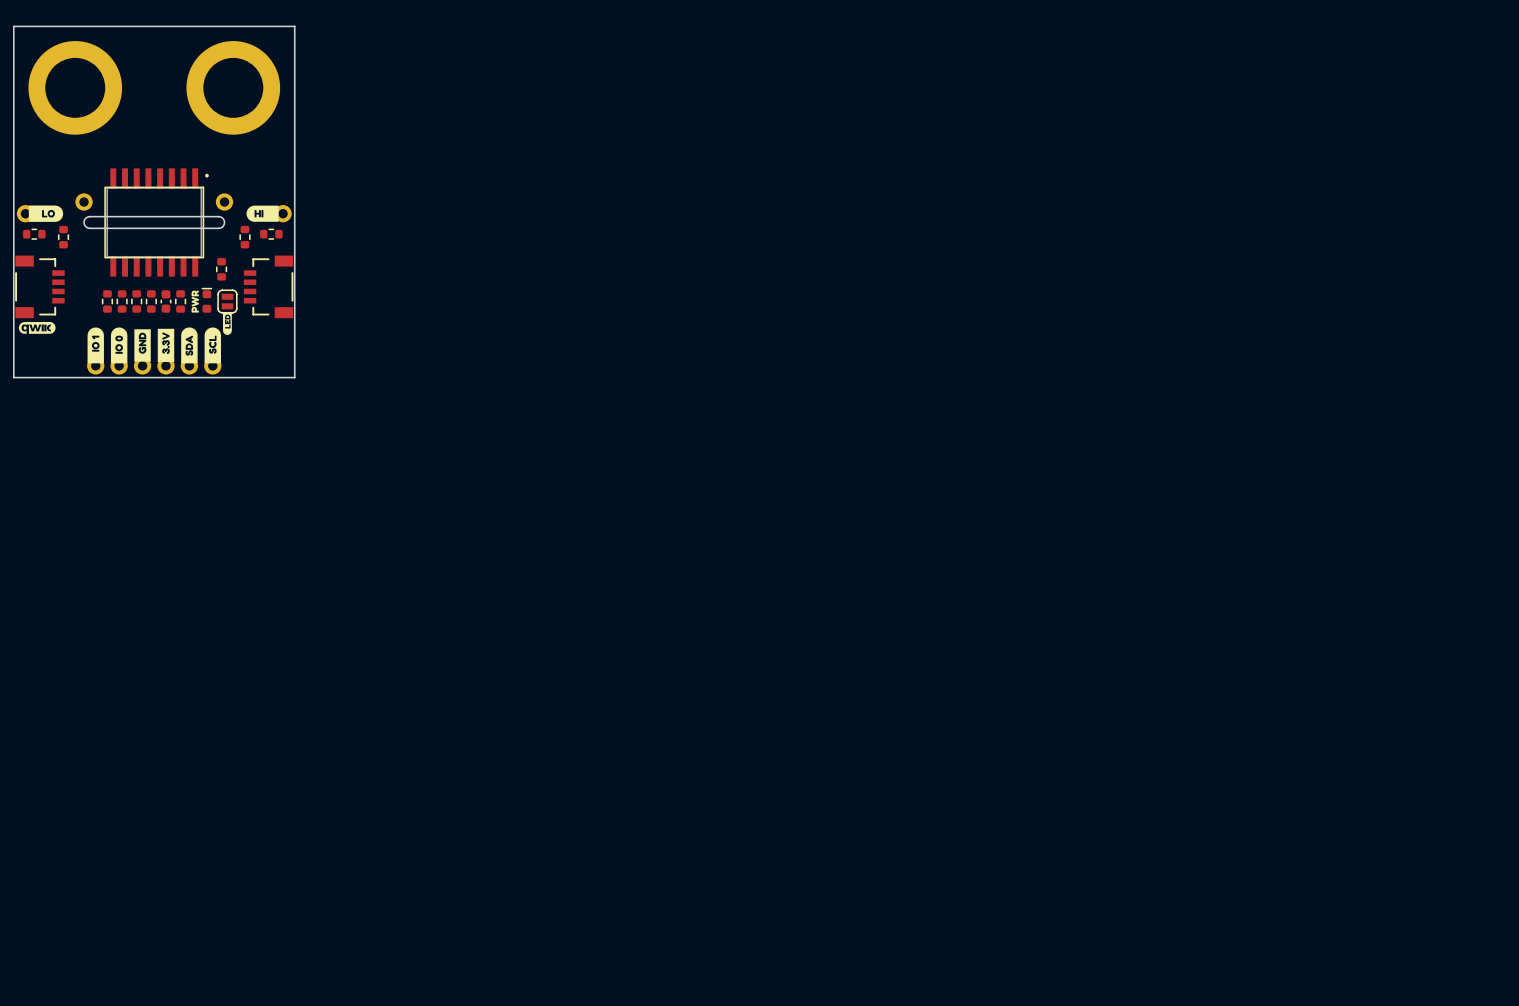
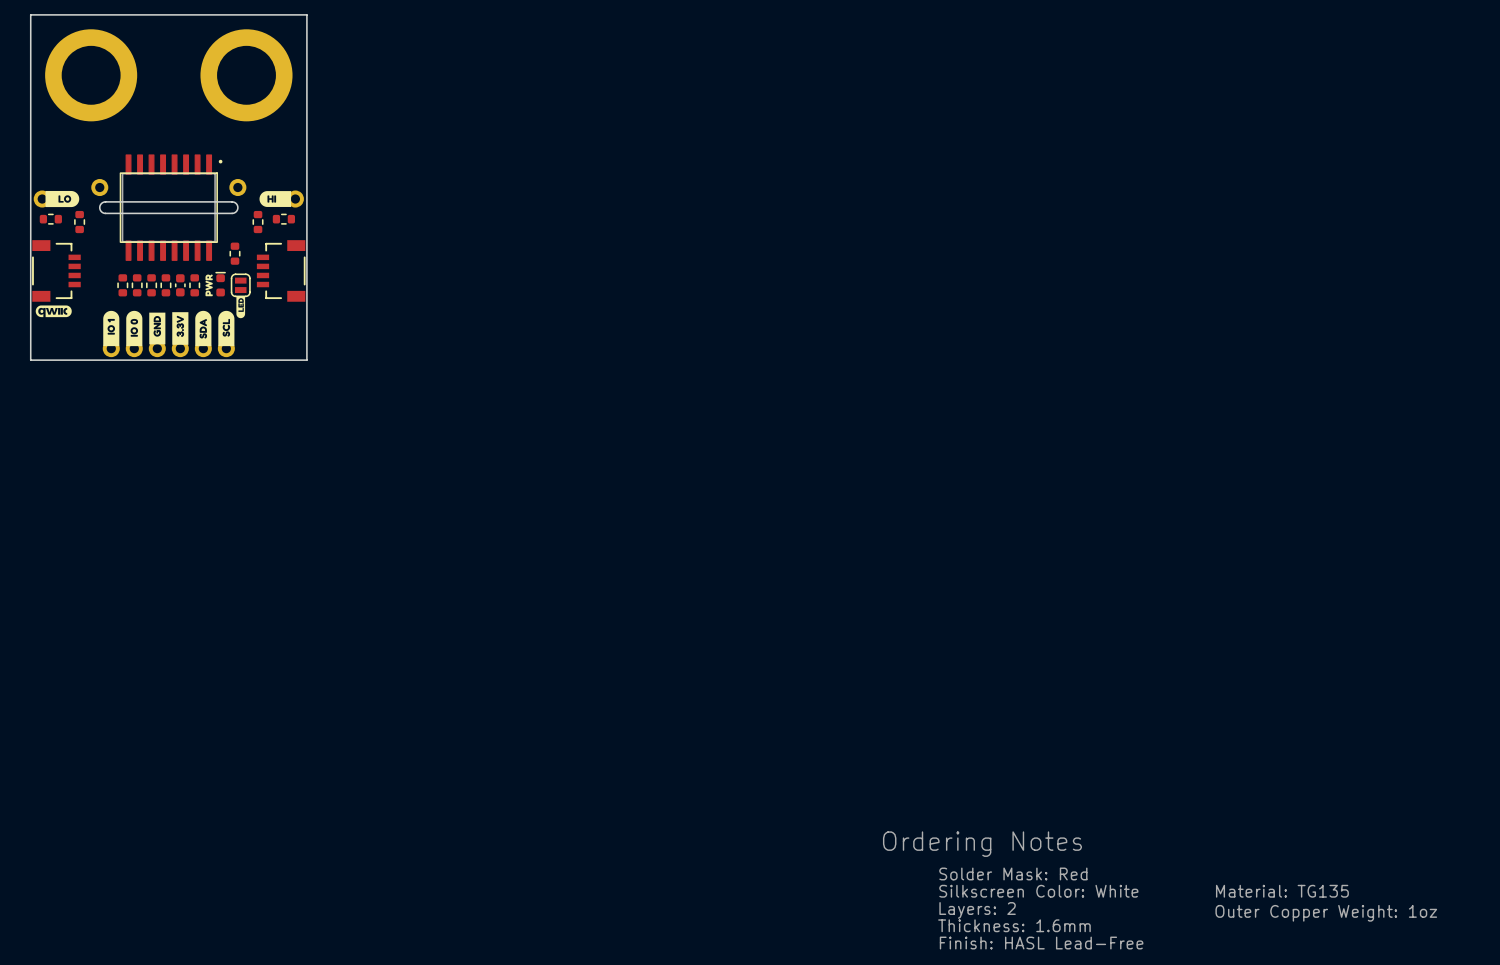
text: none -> Ordering Notes (982, 844)
text: none -> Solder Mask: Red (1013, 873)
text: none -> Silkscreen Color: White (1038, 891)
text: none -> Material: TG135 (1282, 891)
text: none -> Layers: 2 (977, 910)
text: none -> Outer Copper Weight: 1oz (1326, 913)
text: none -> Thickness: 1.6mm (1014, 925)
text: none -> Finish: HASL Lead-Free (1041, 943)

